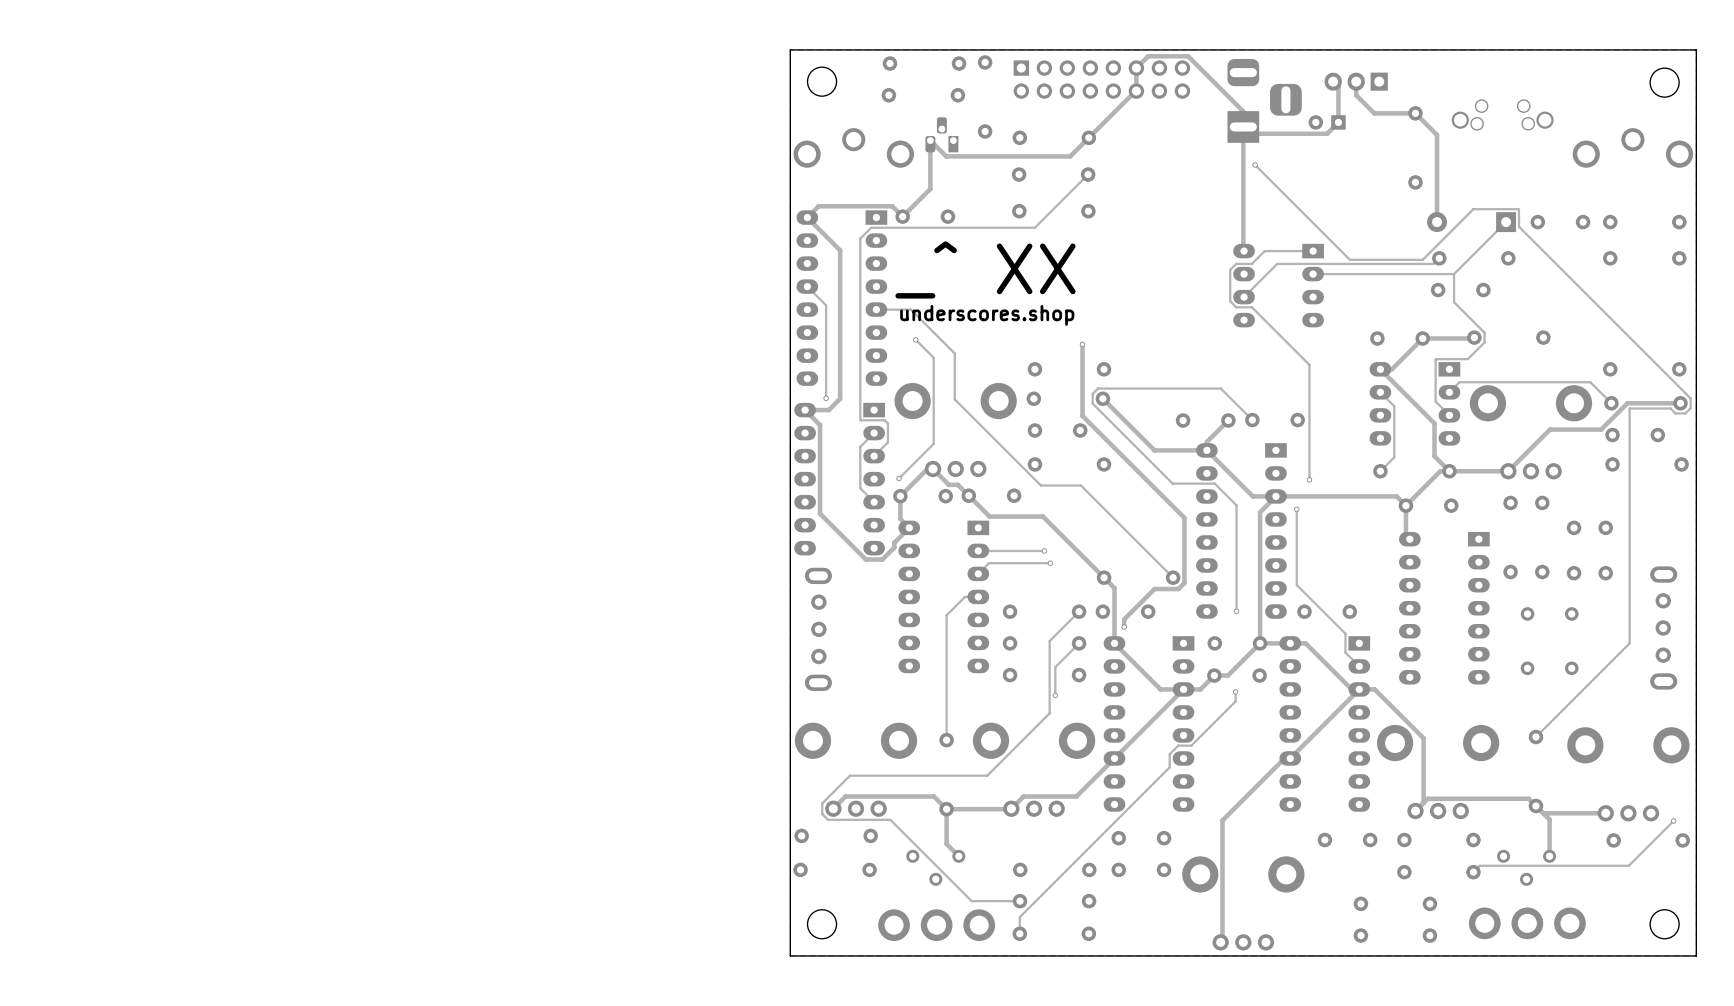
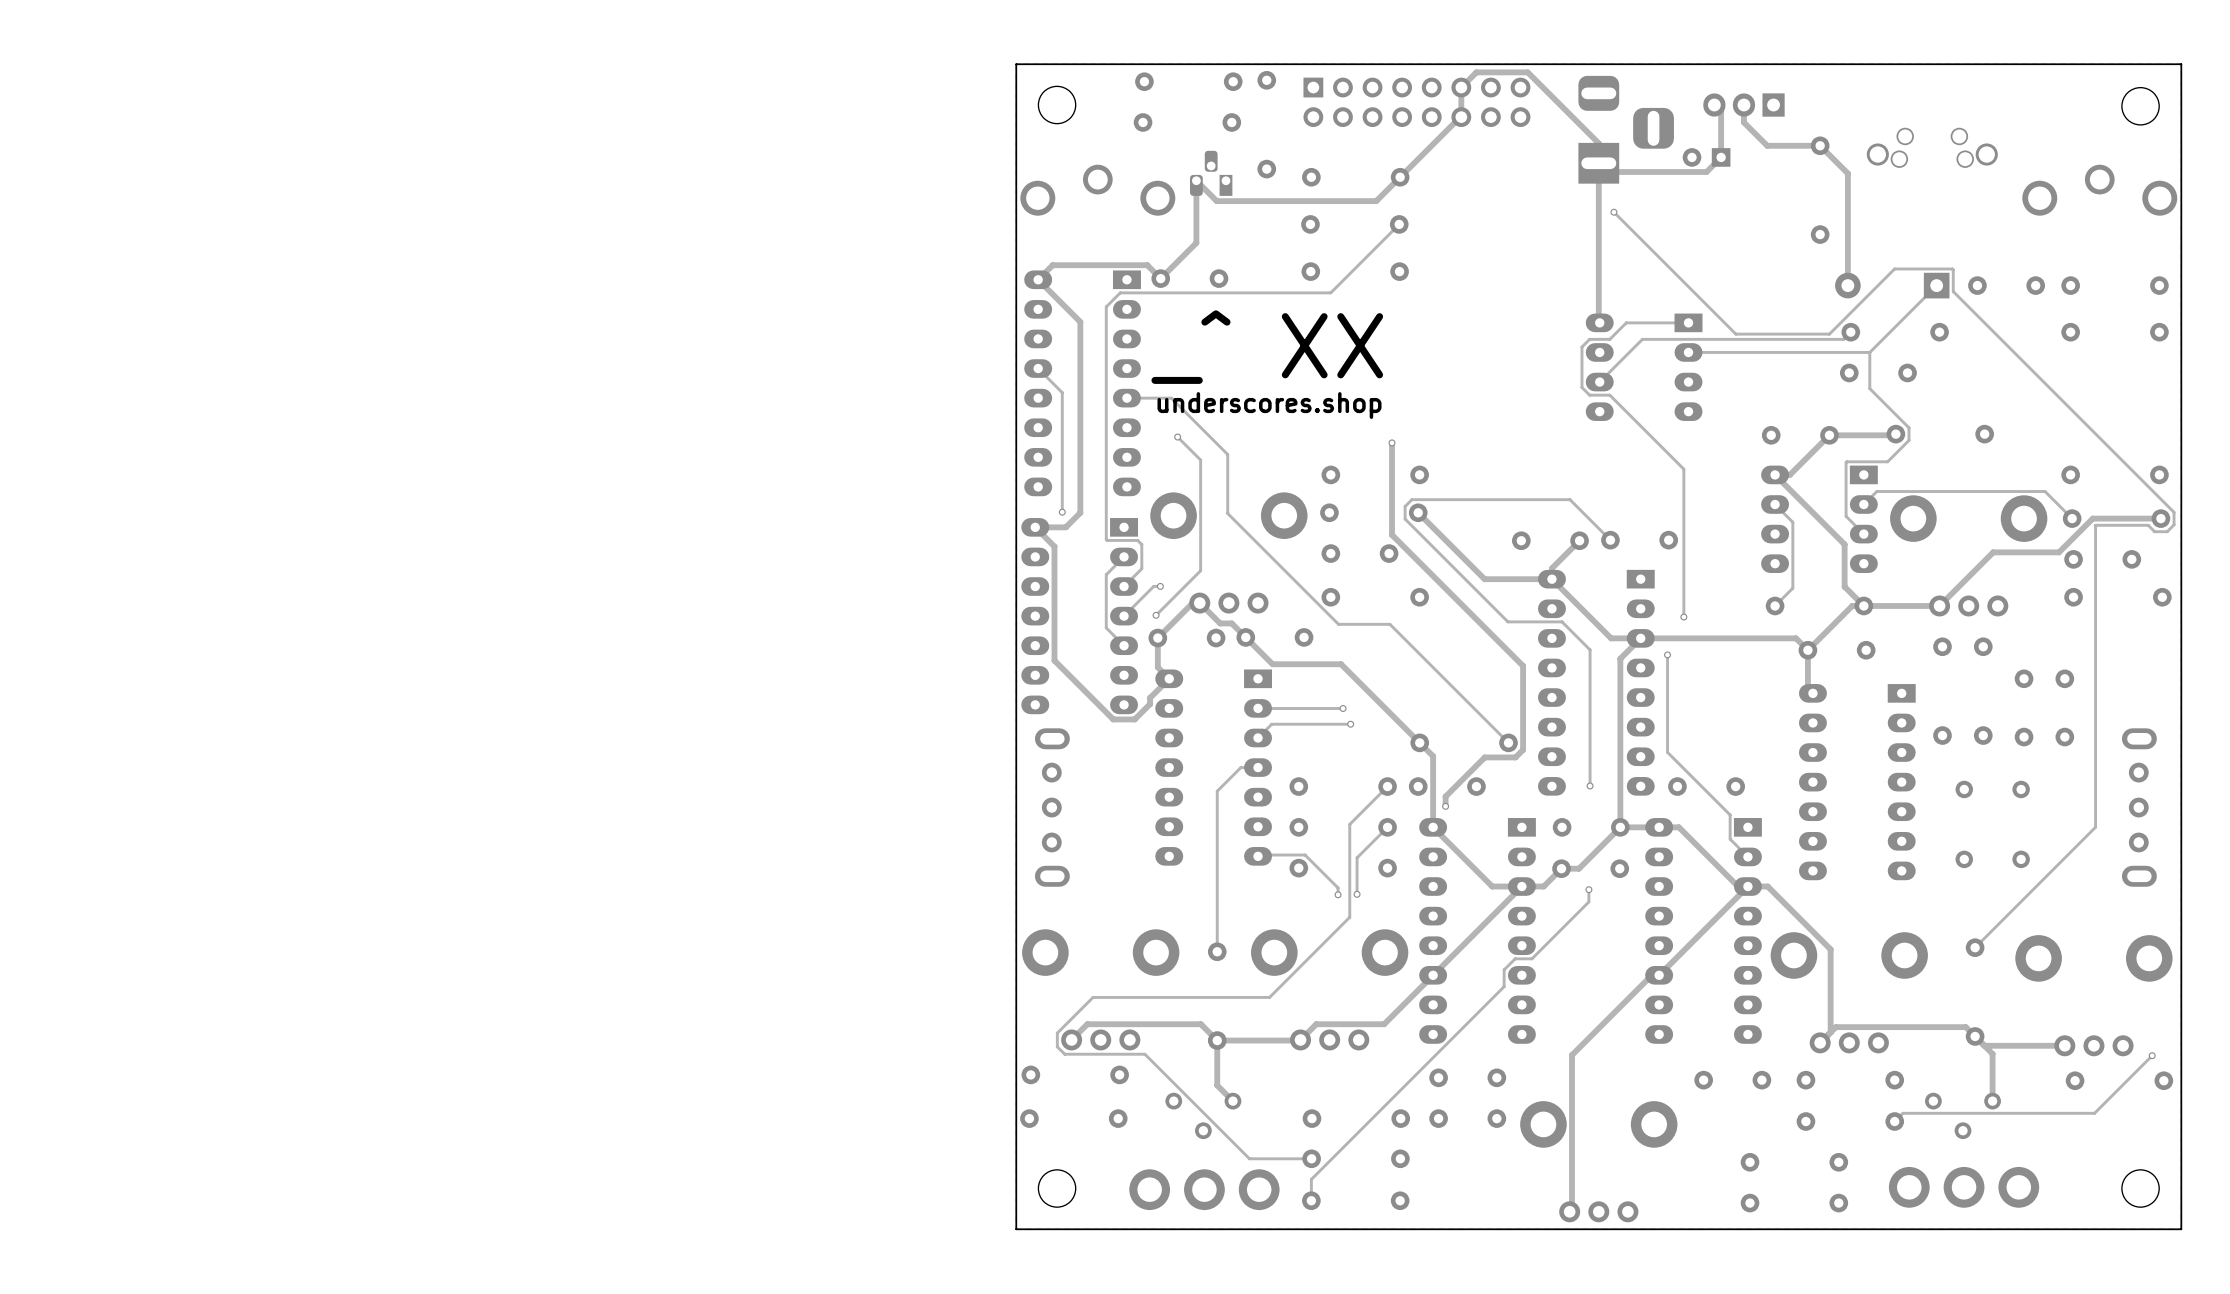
track: none -> (1160, 586) (1153, 586) (1124, 616)
via: none -> (1160, 586)
part rotation: 0° (818, 629) -> 180° (1052, 807)
track: none -> (1258, 856) (1305, 855) (1338, 887) (1338, 894)
via: none -> (1338, 894)

